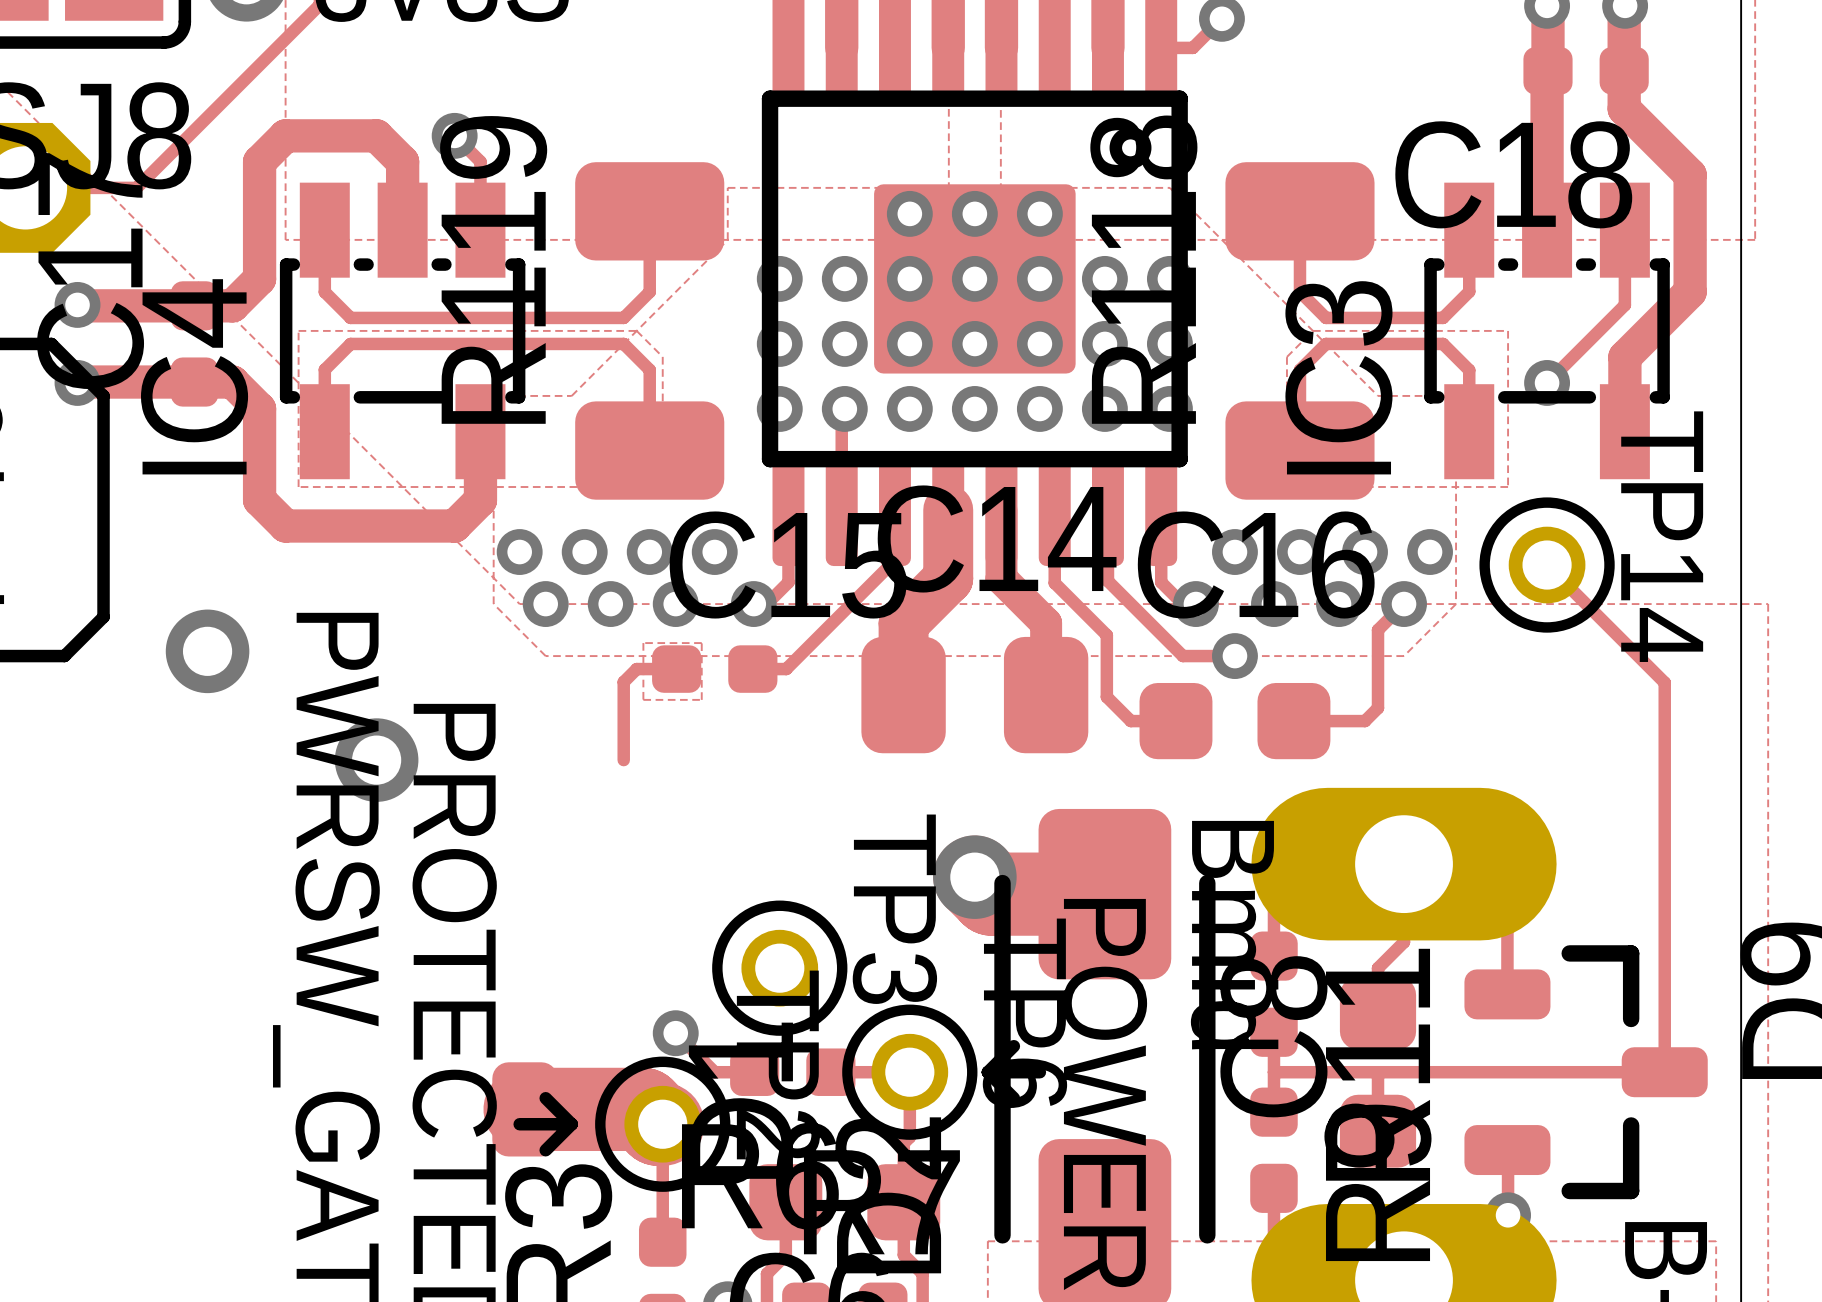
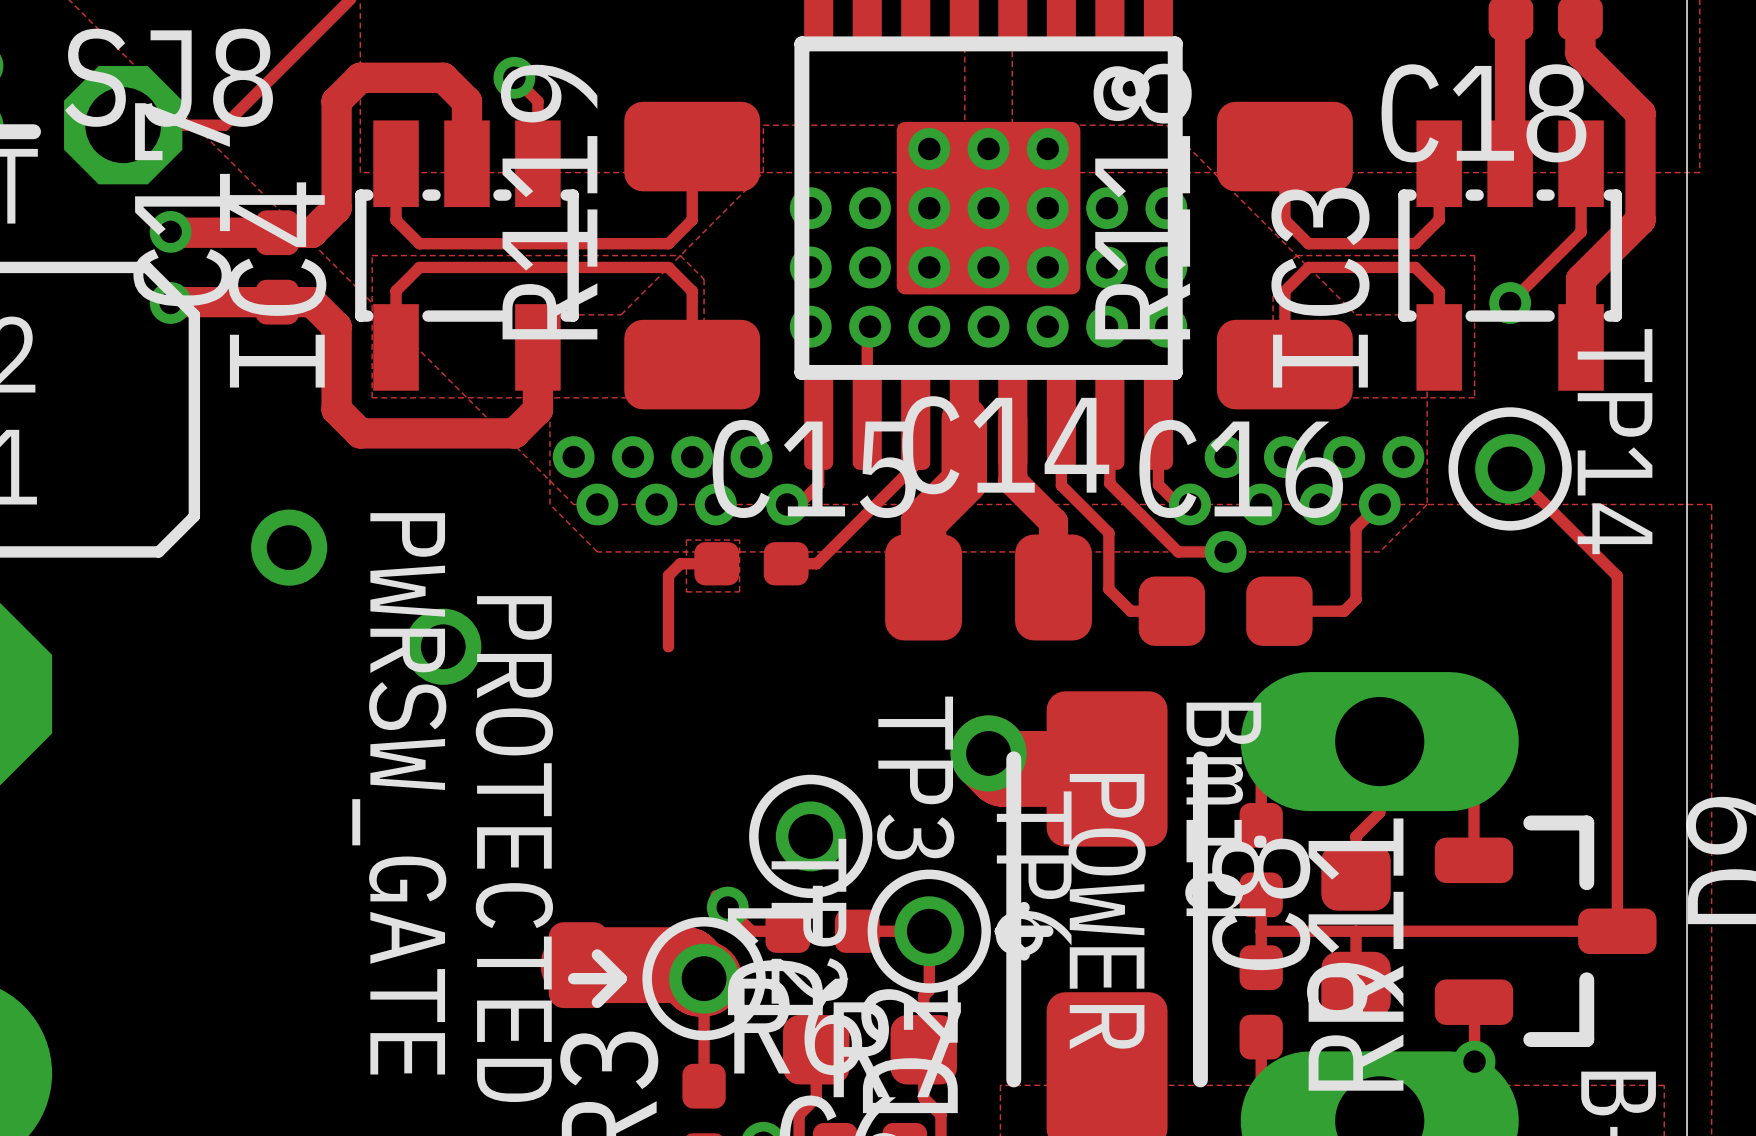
via position: (675, 1033) -> (727, 907)

